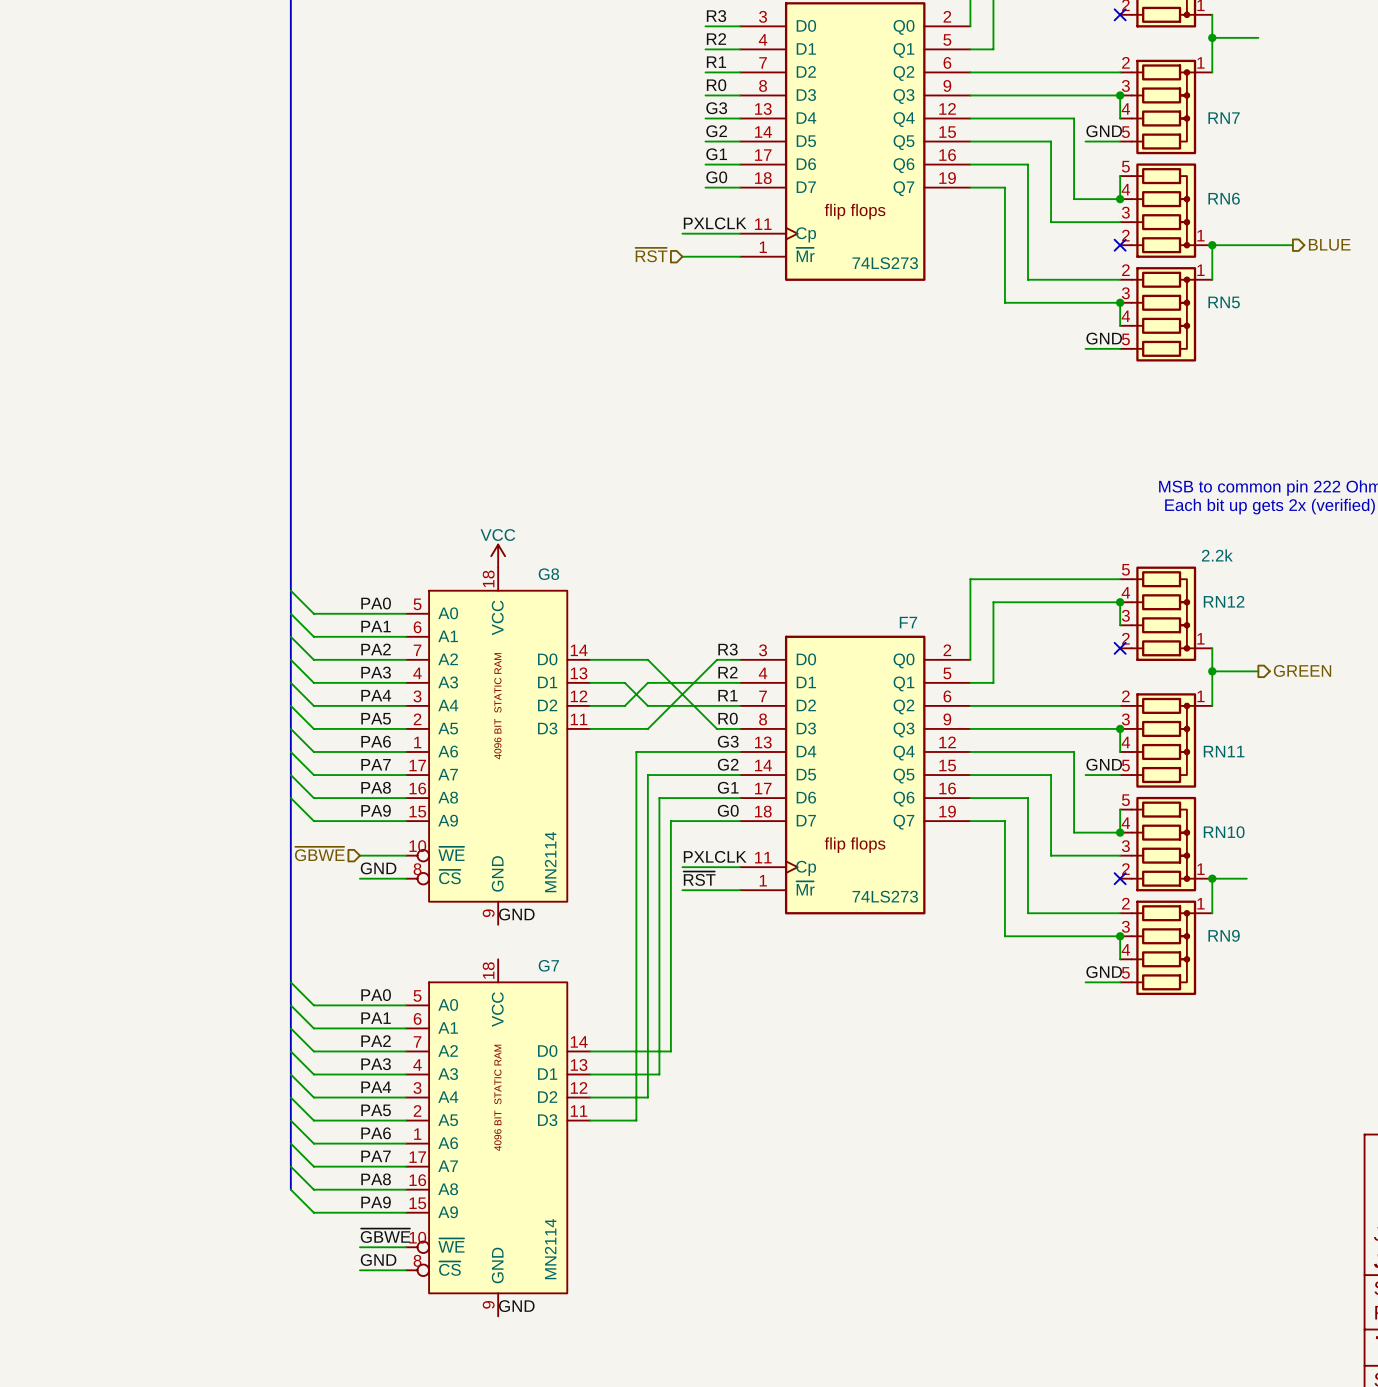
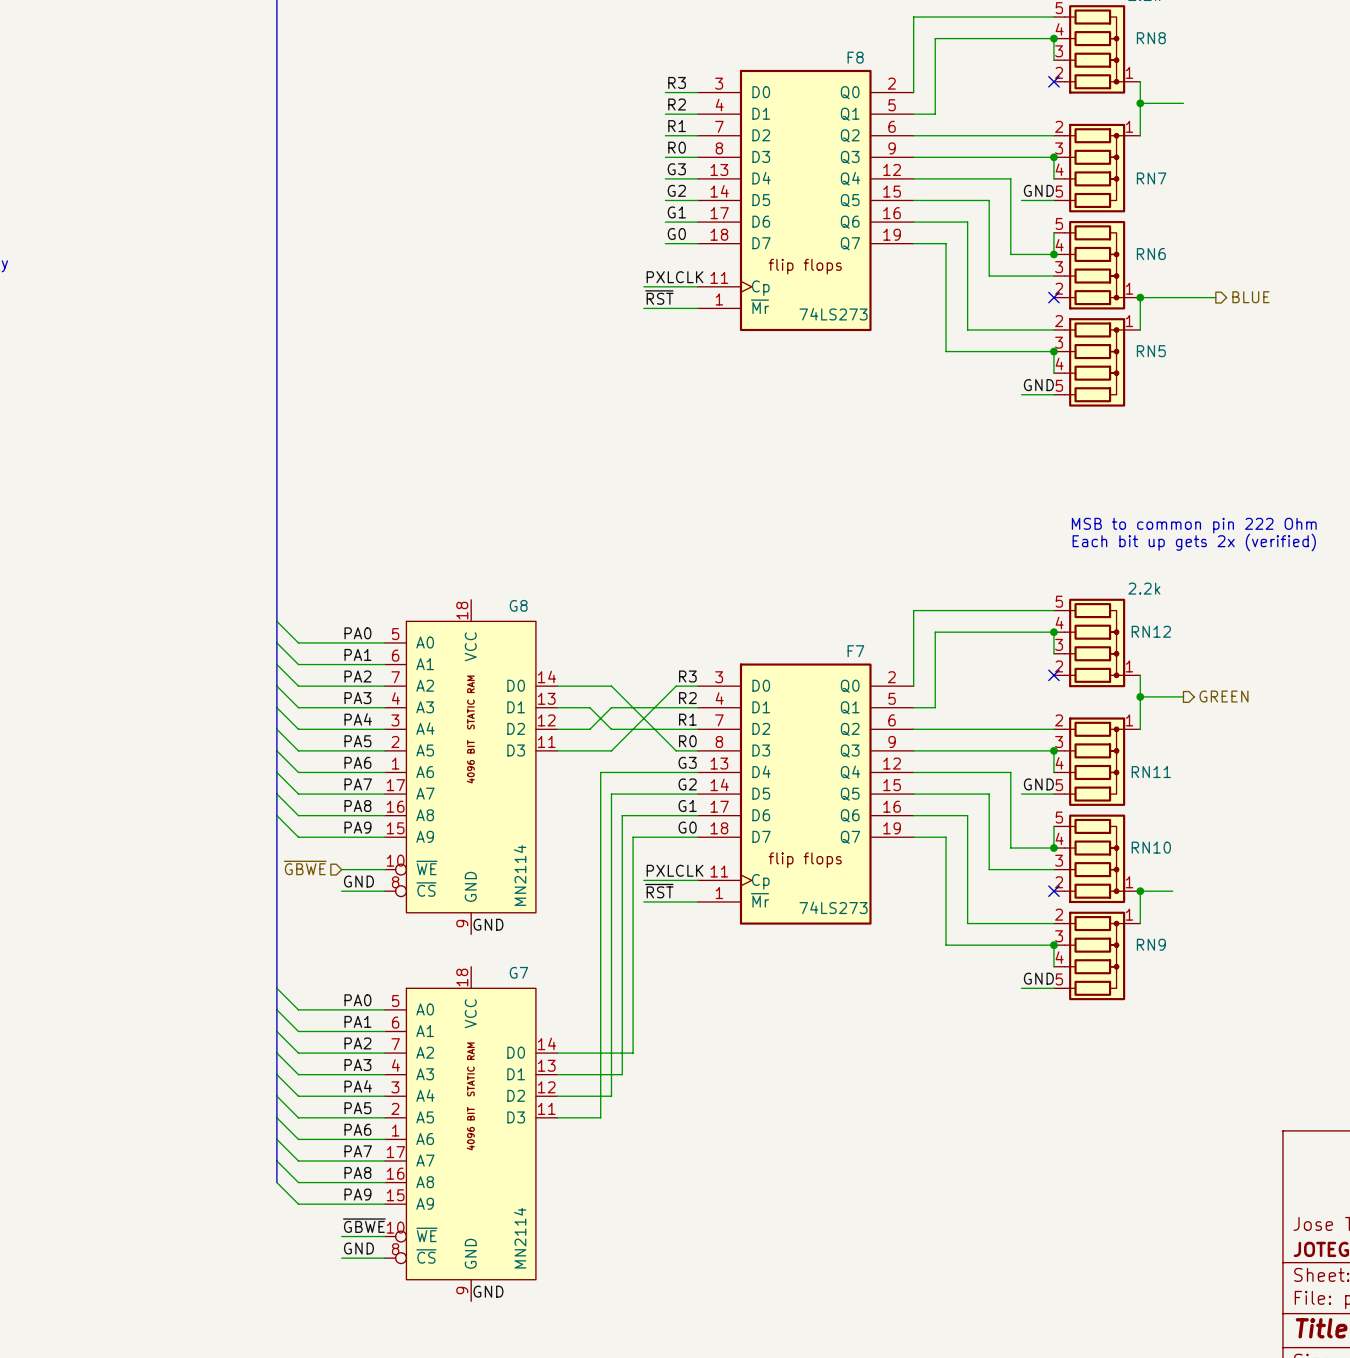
label: none -> ~{RST} (659, 297)
hierarchical label: ~{RST} (651, 255) -> none
power symbol: VCC (498, 556) -> none

